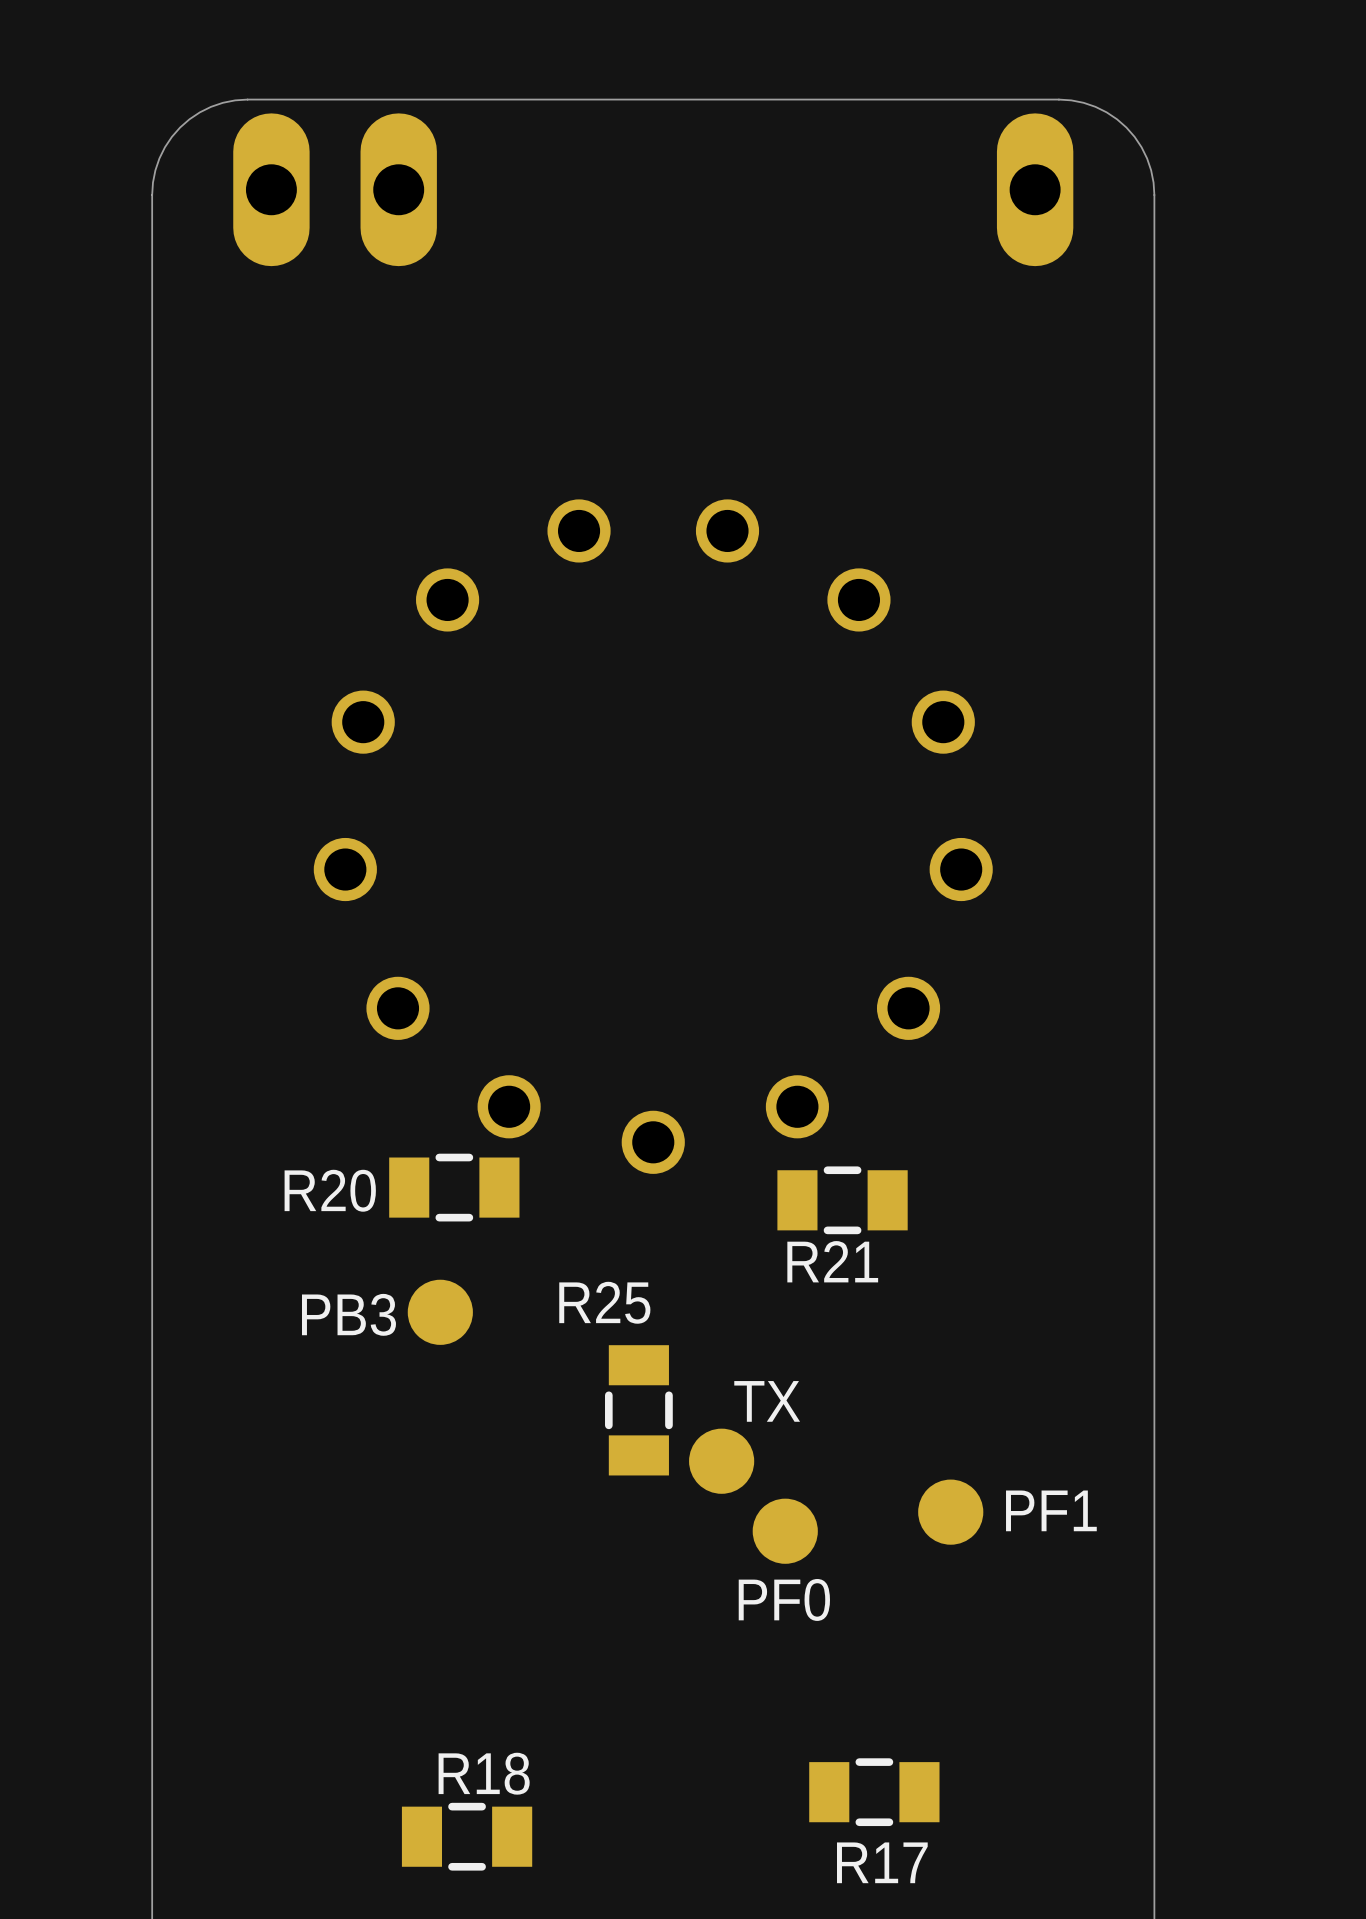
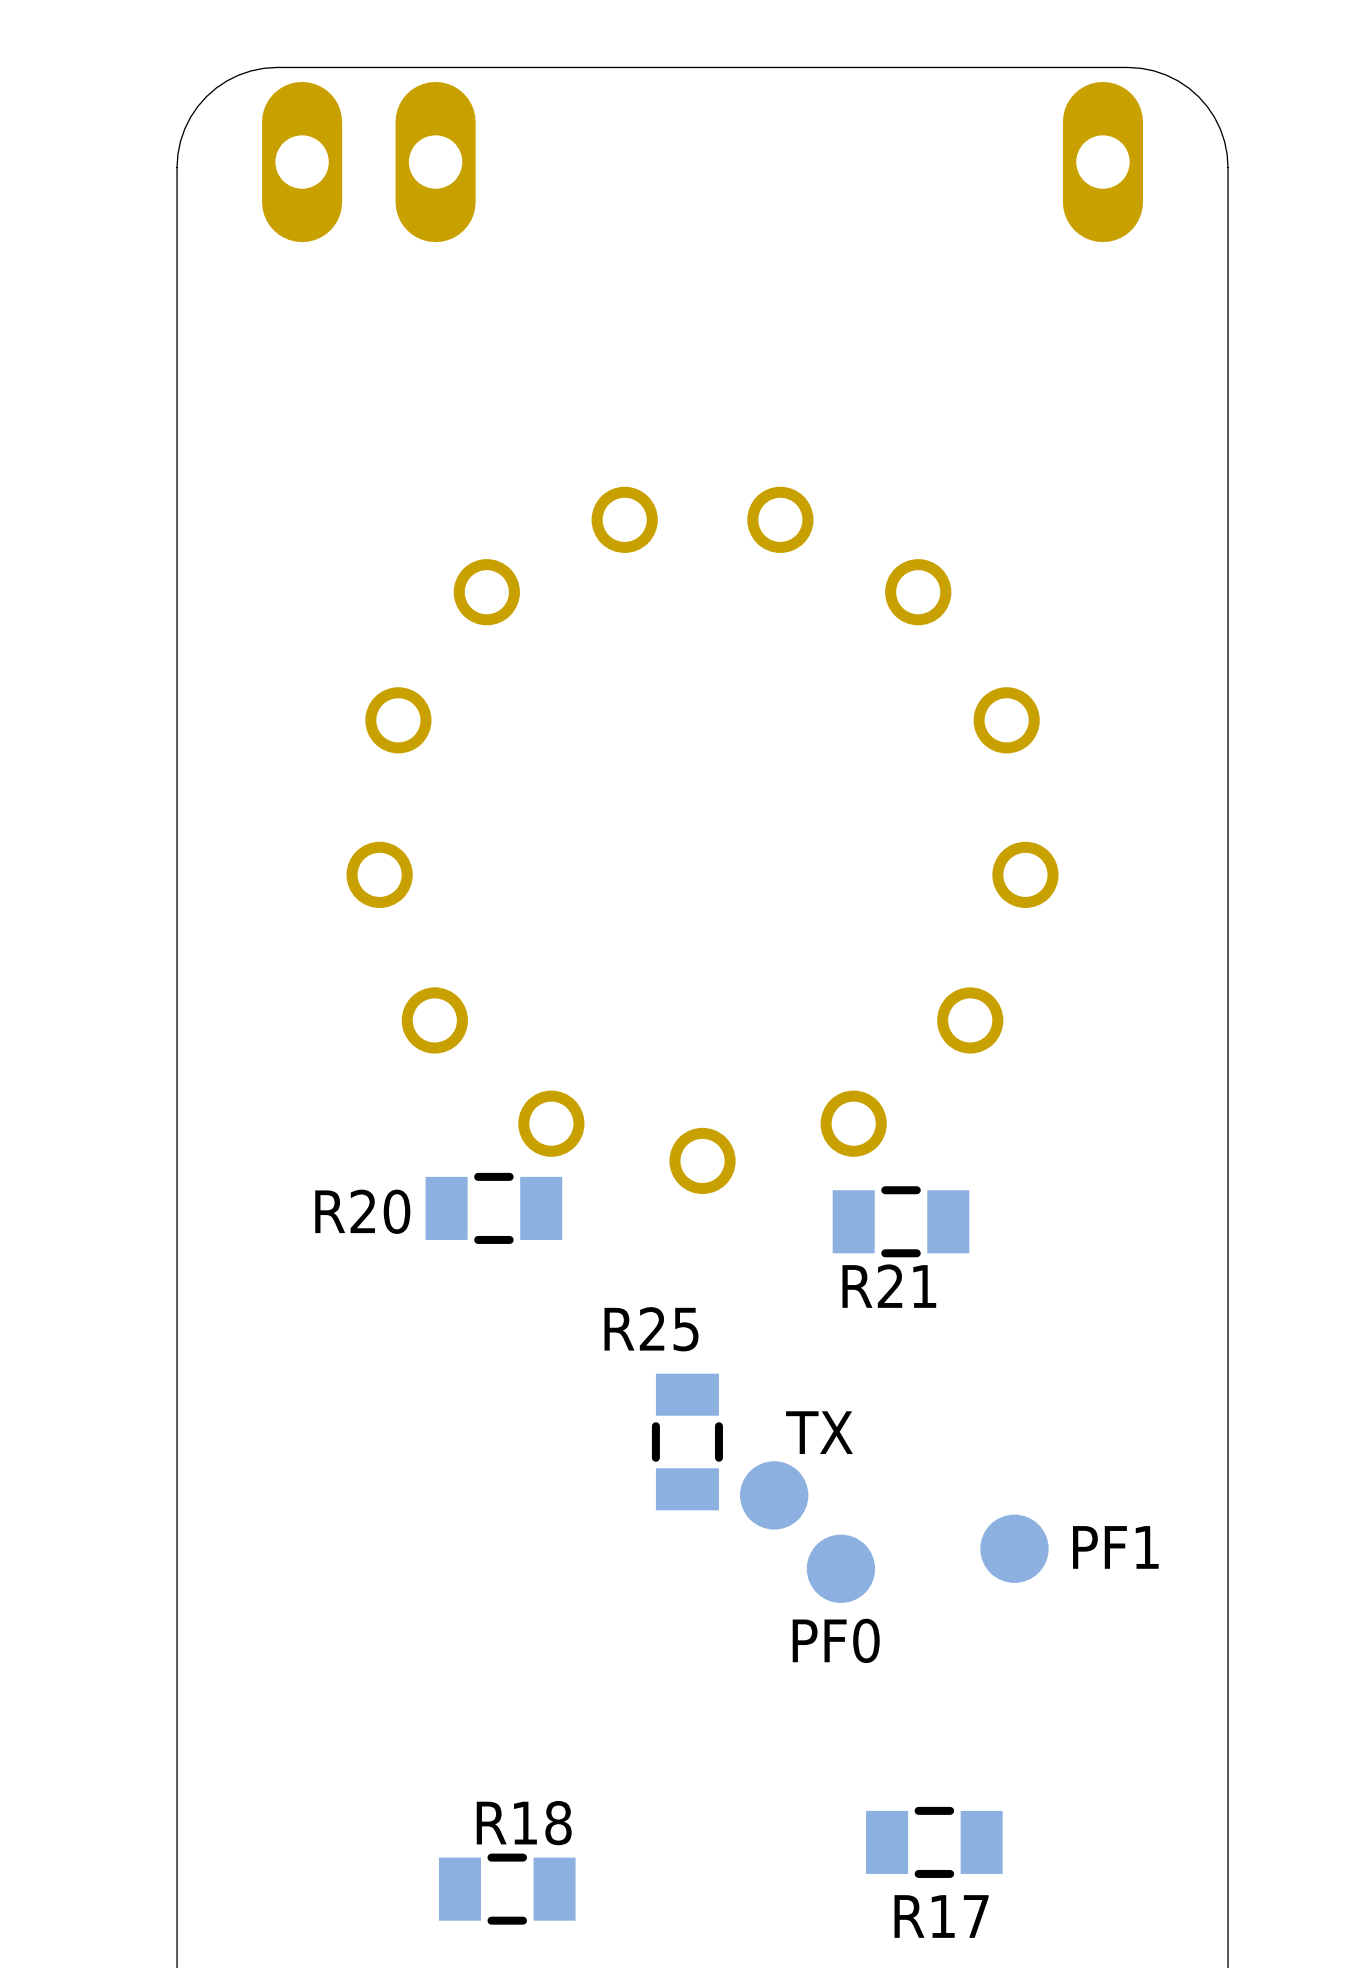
part: (440, 1312) -> none
text: PB3 (348, 1314) -> none

